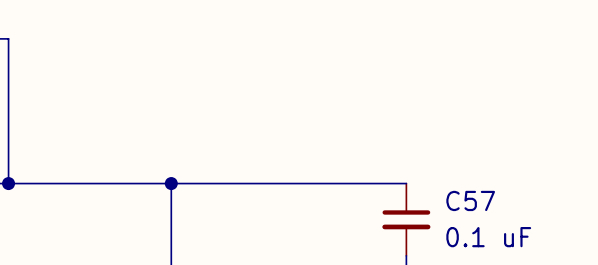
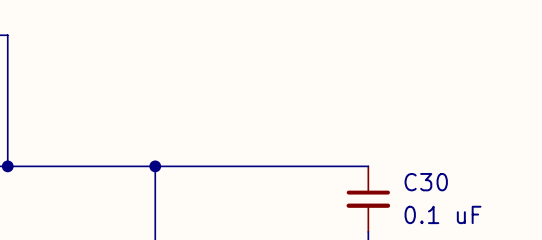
C57 name: C57 (470, 200) -> C30 (426, 182)

